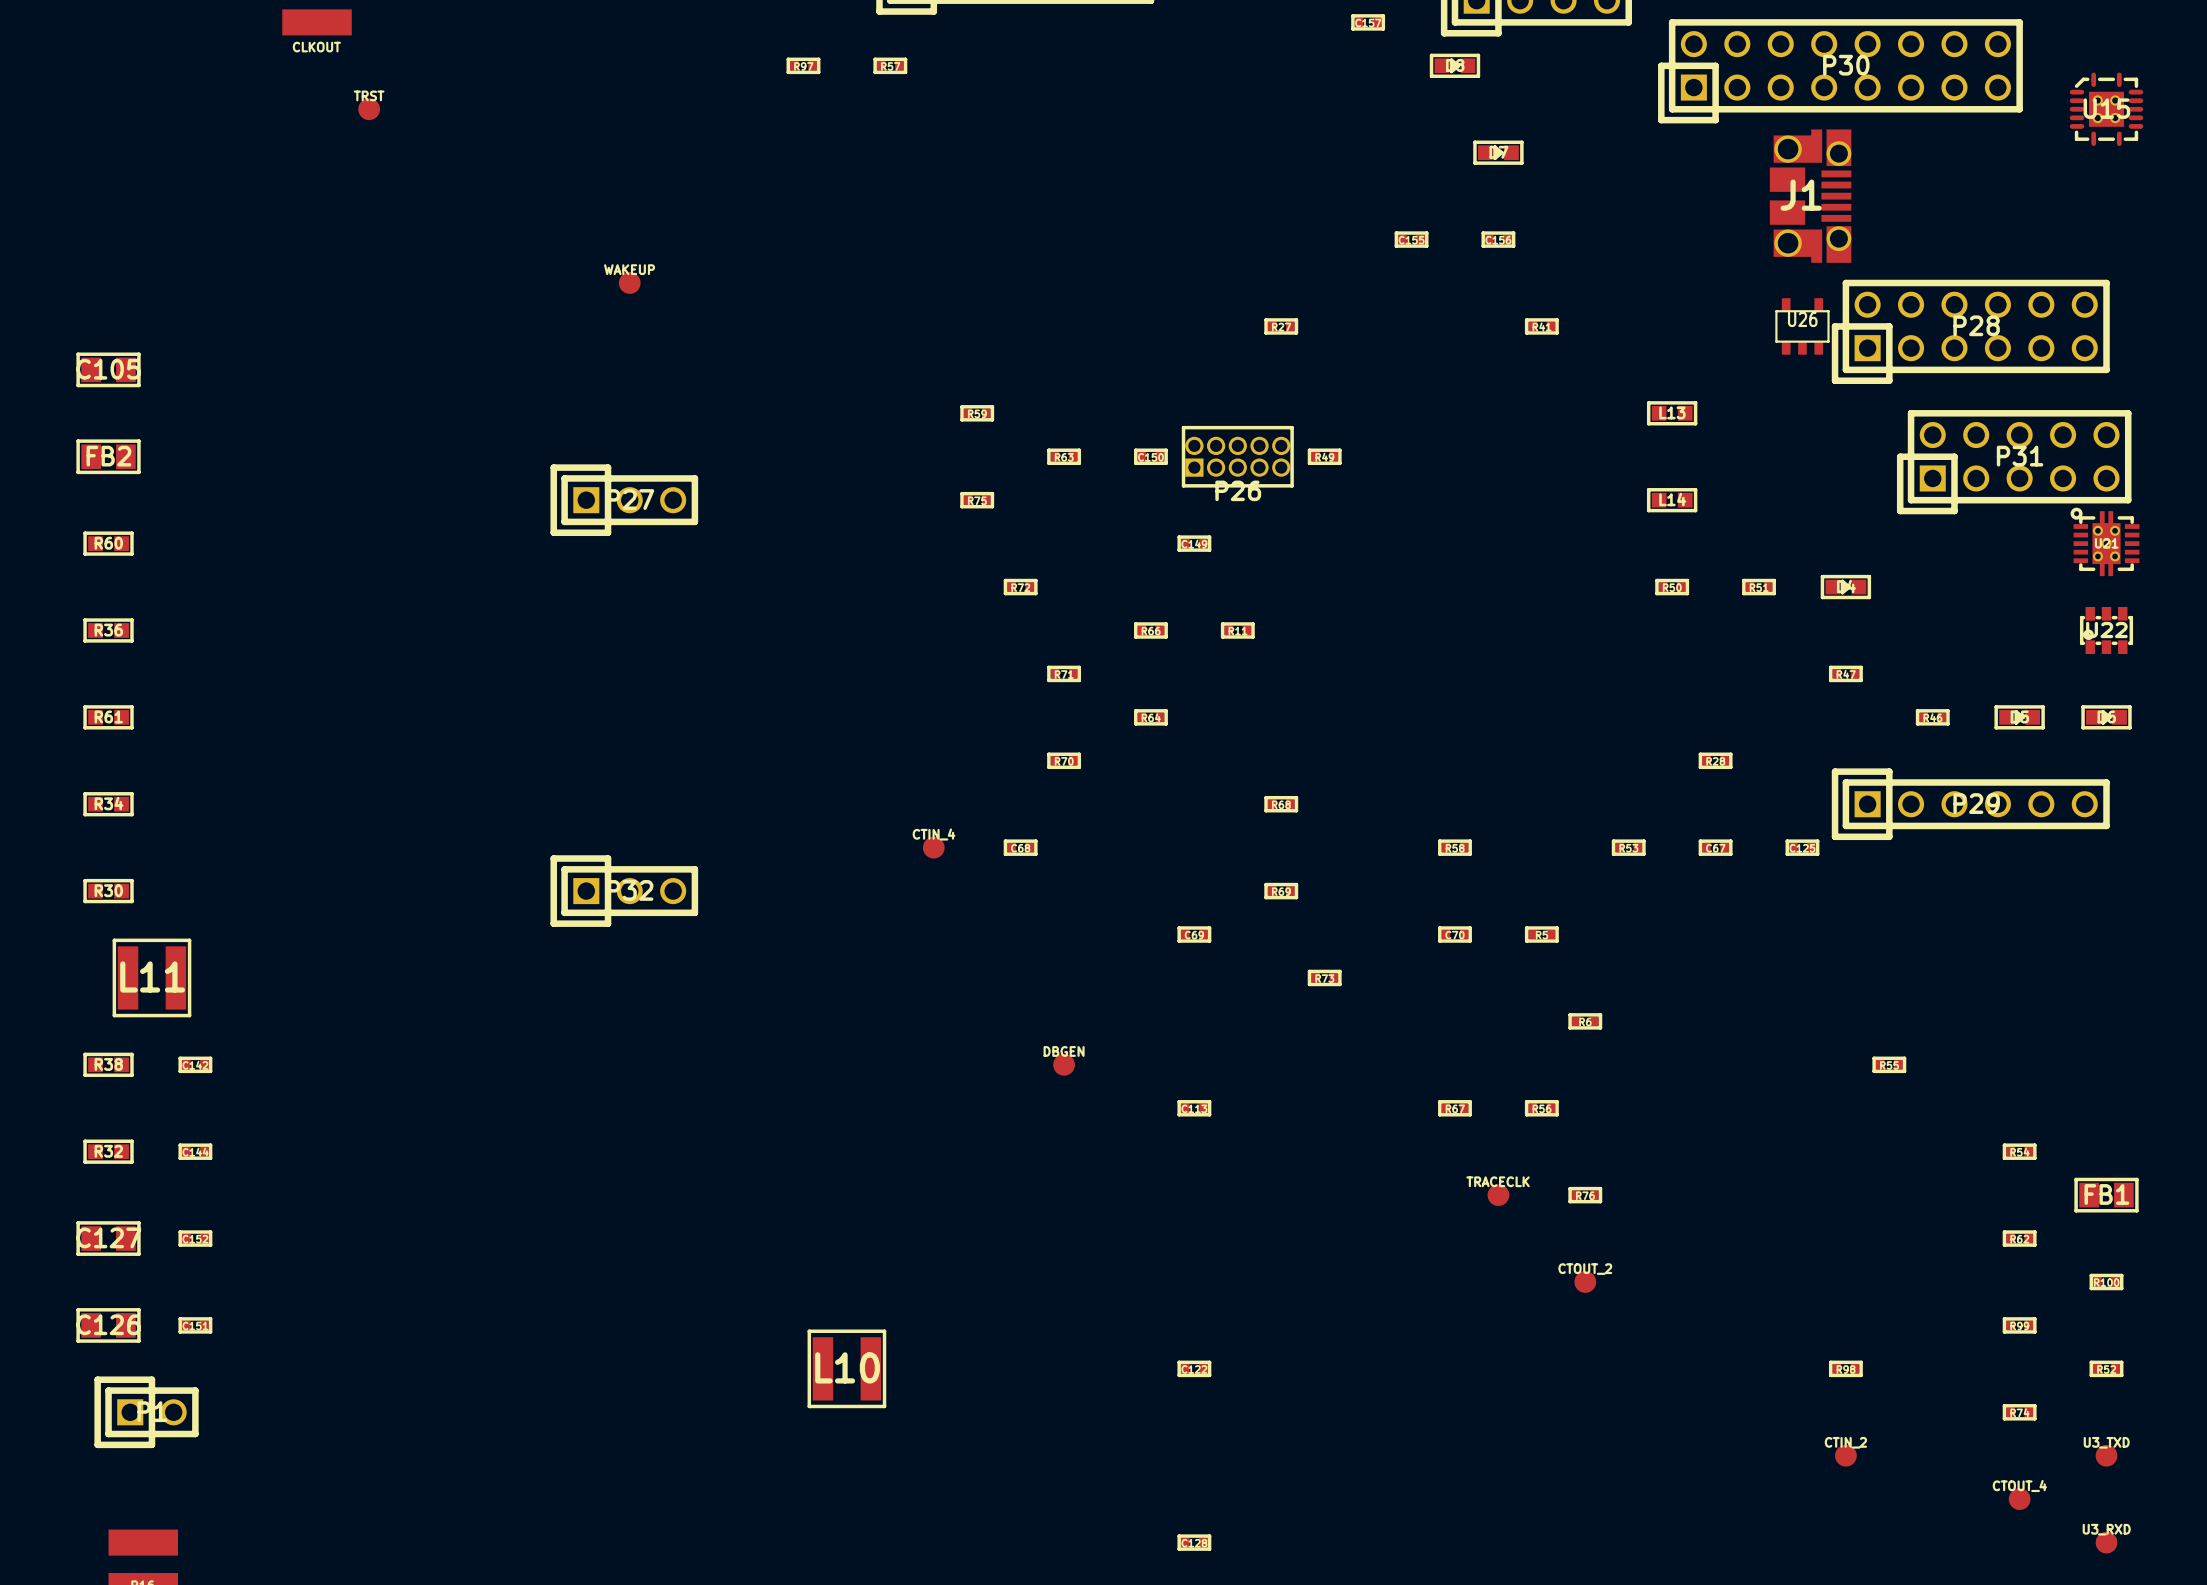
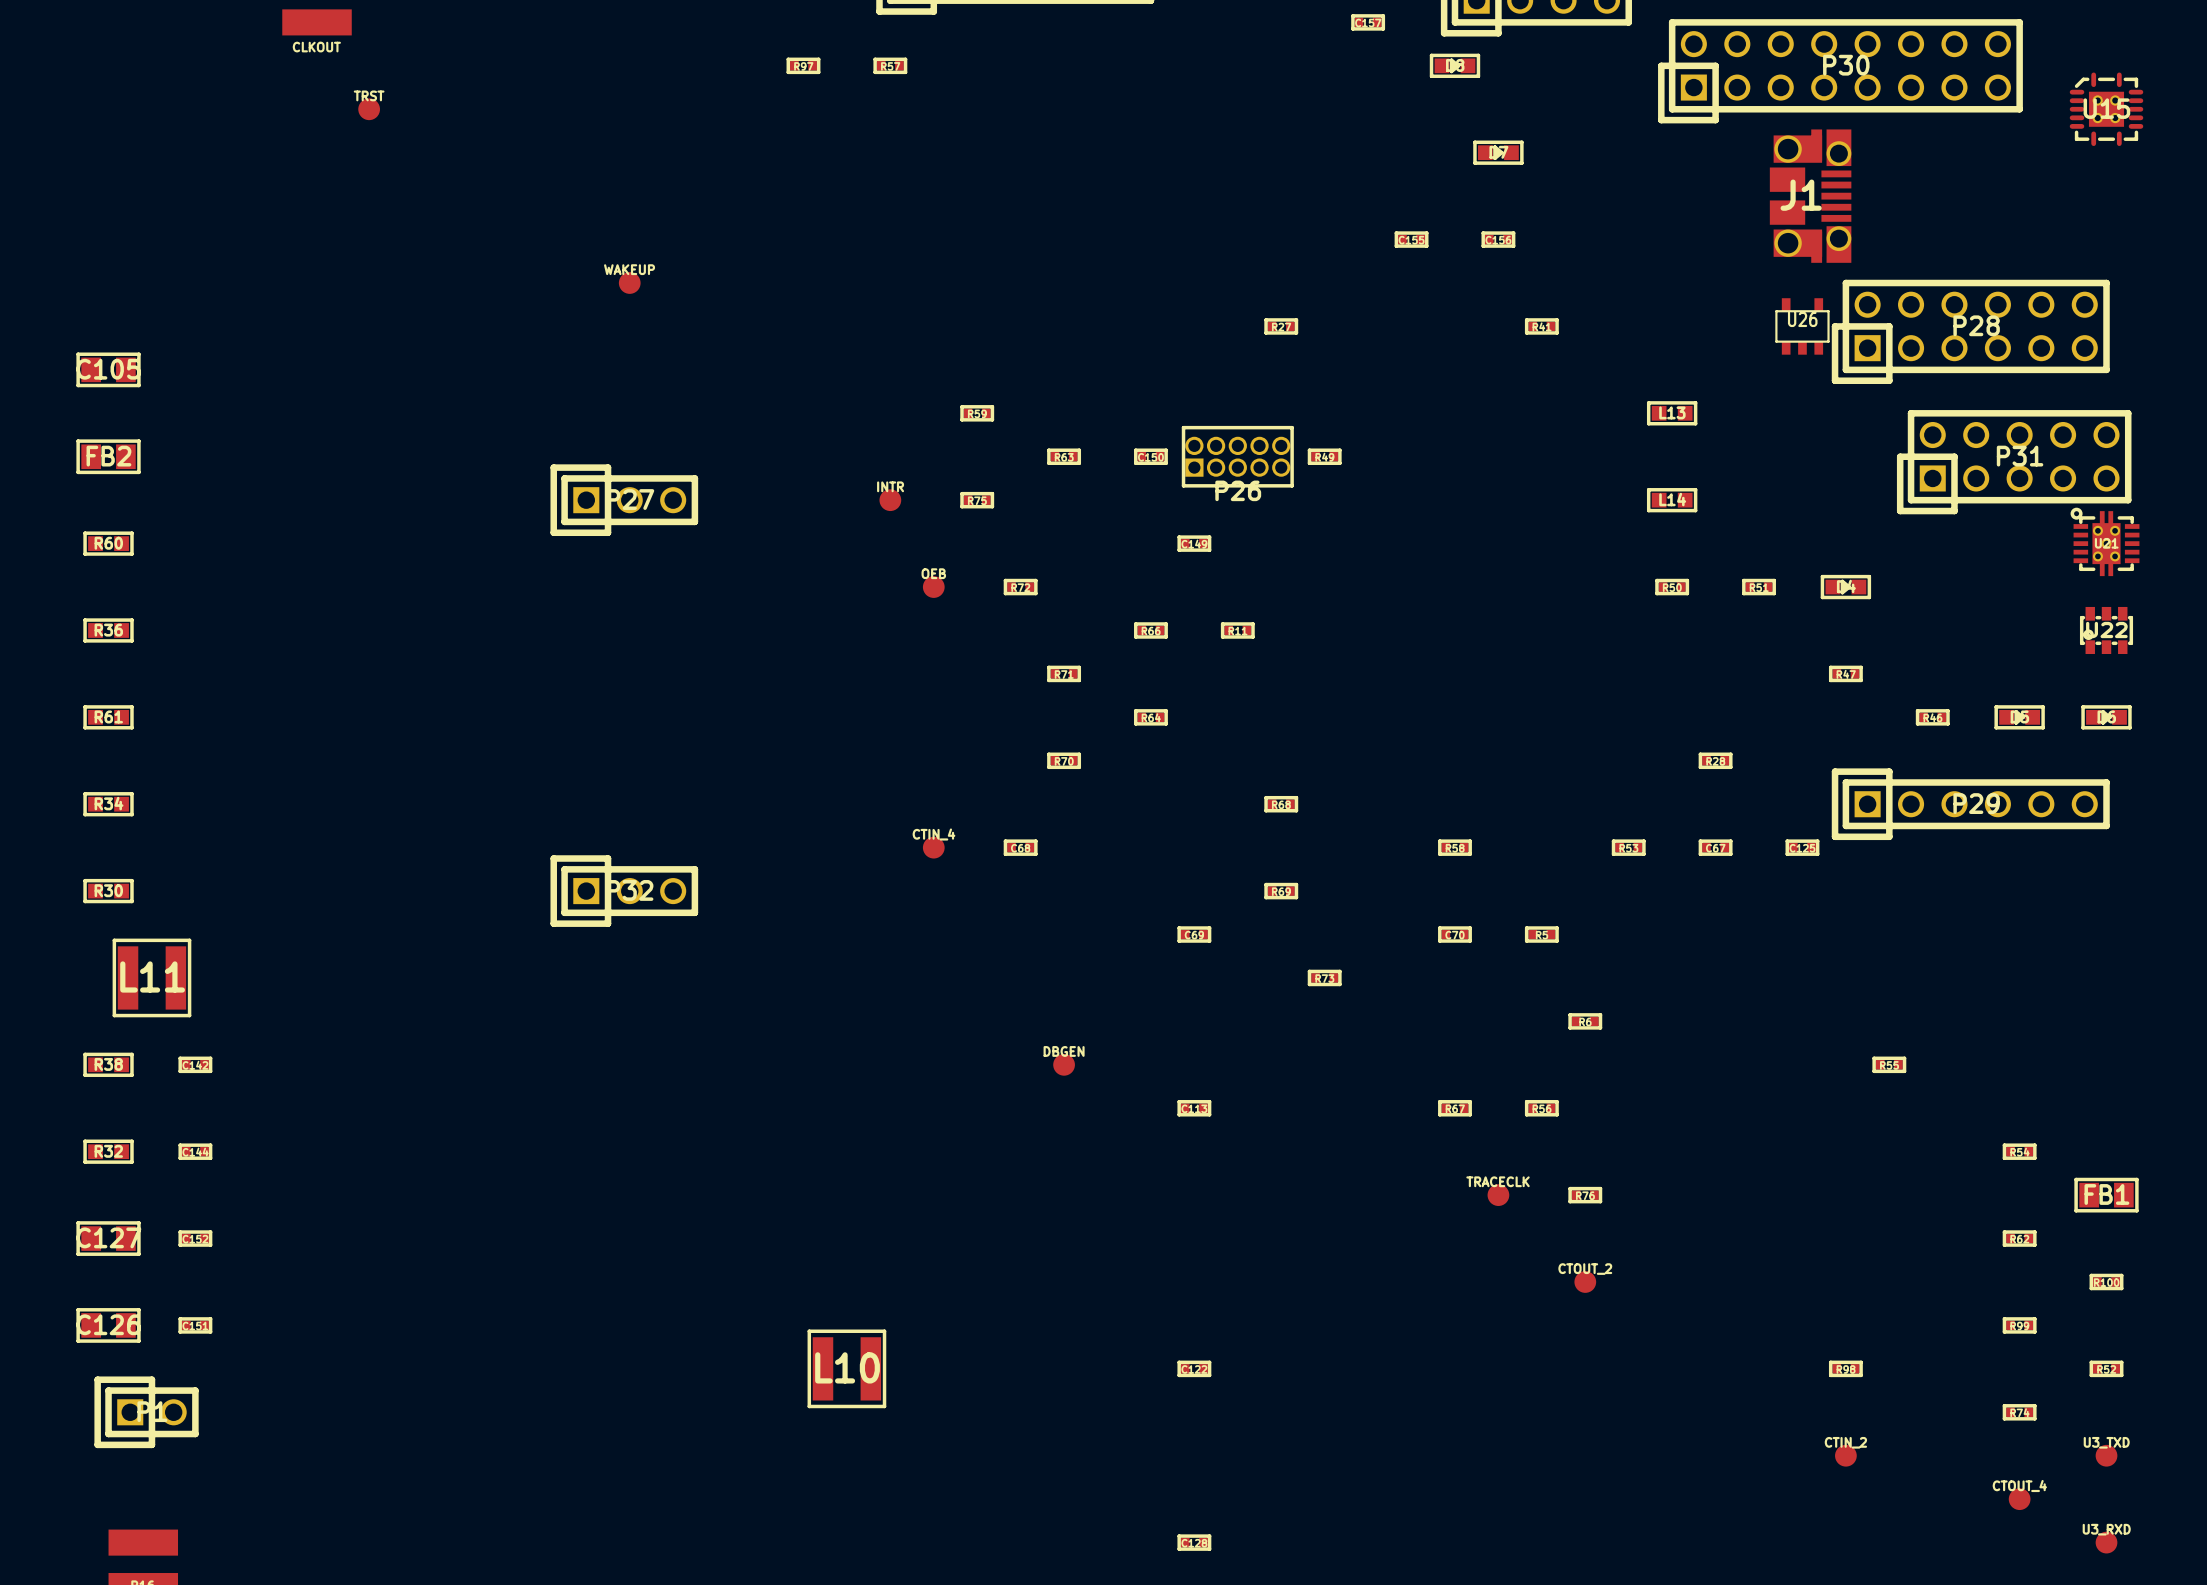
part: none -> INTR (890, 500)
part: none -> OEB (933, 587)

